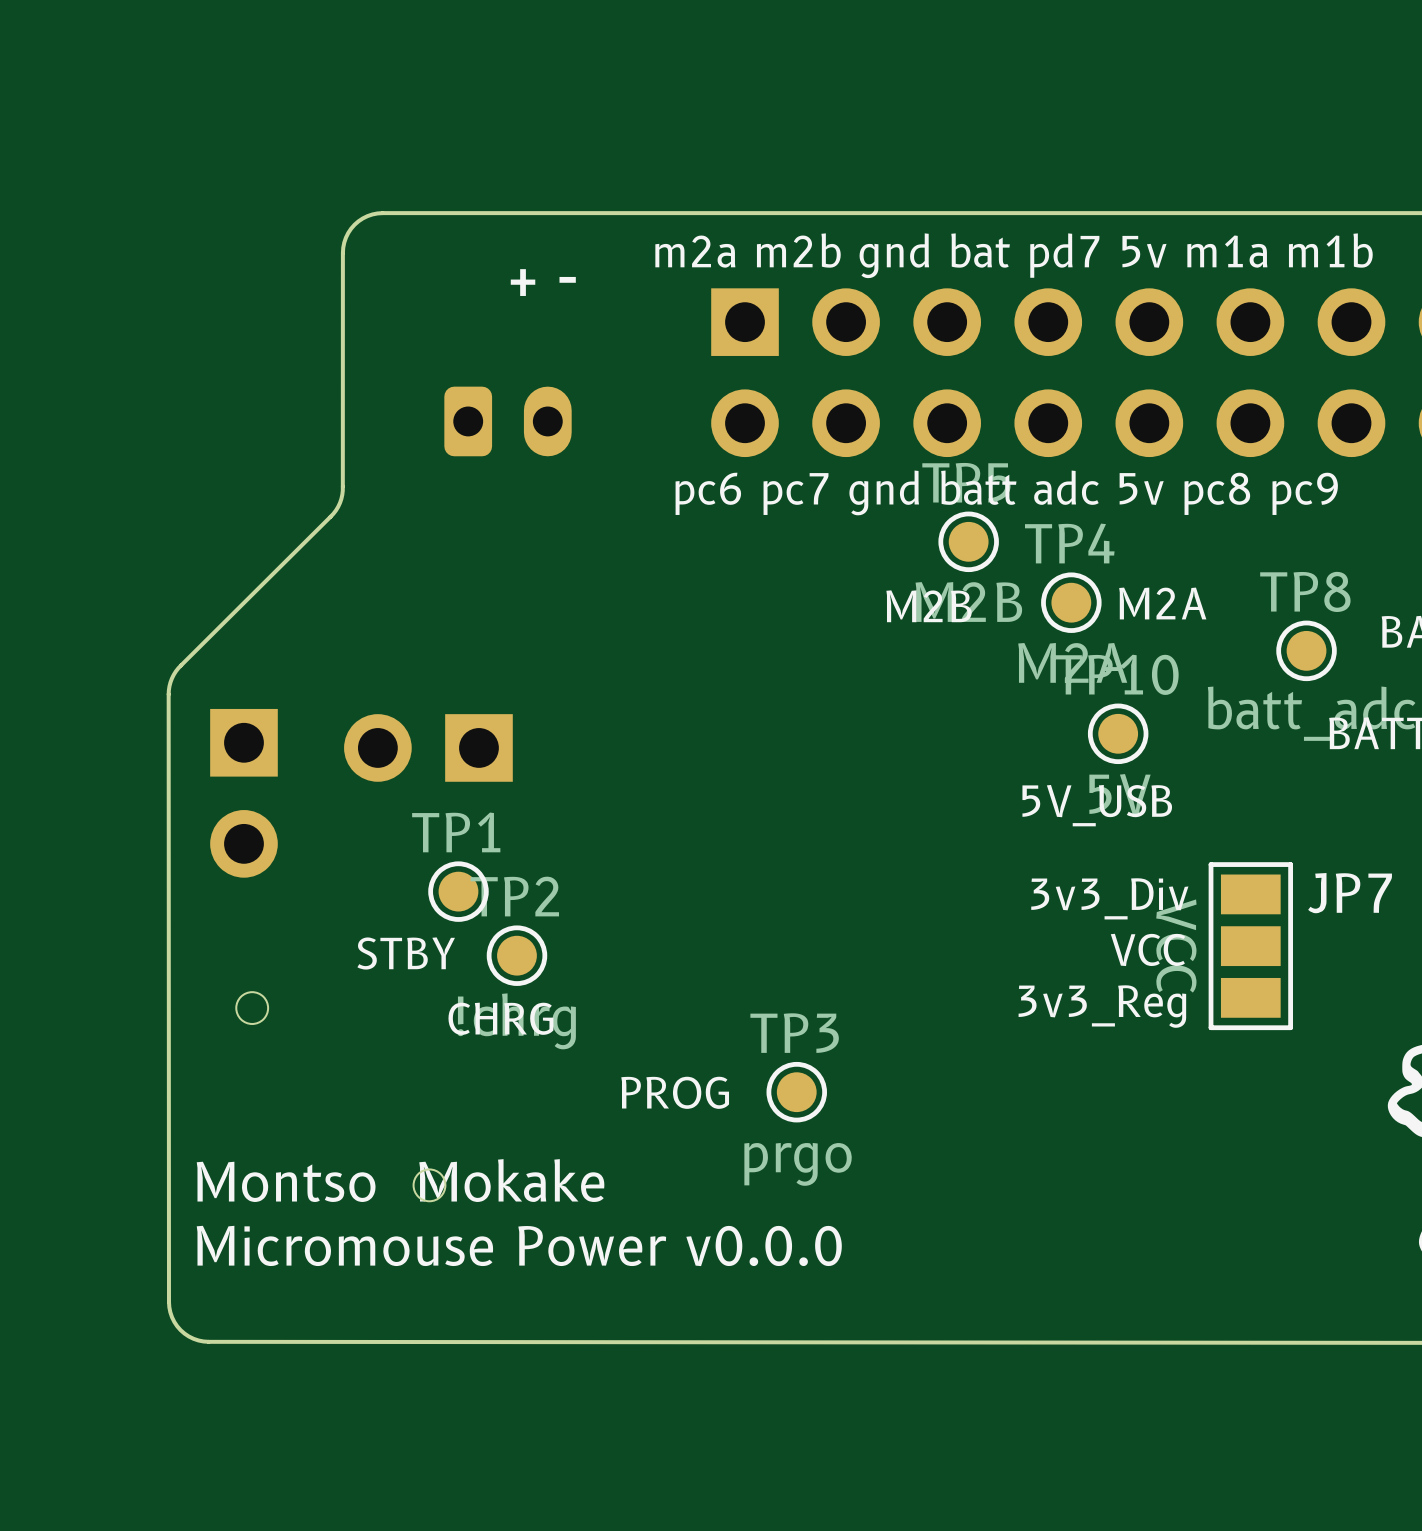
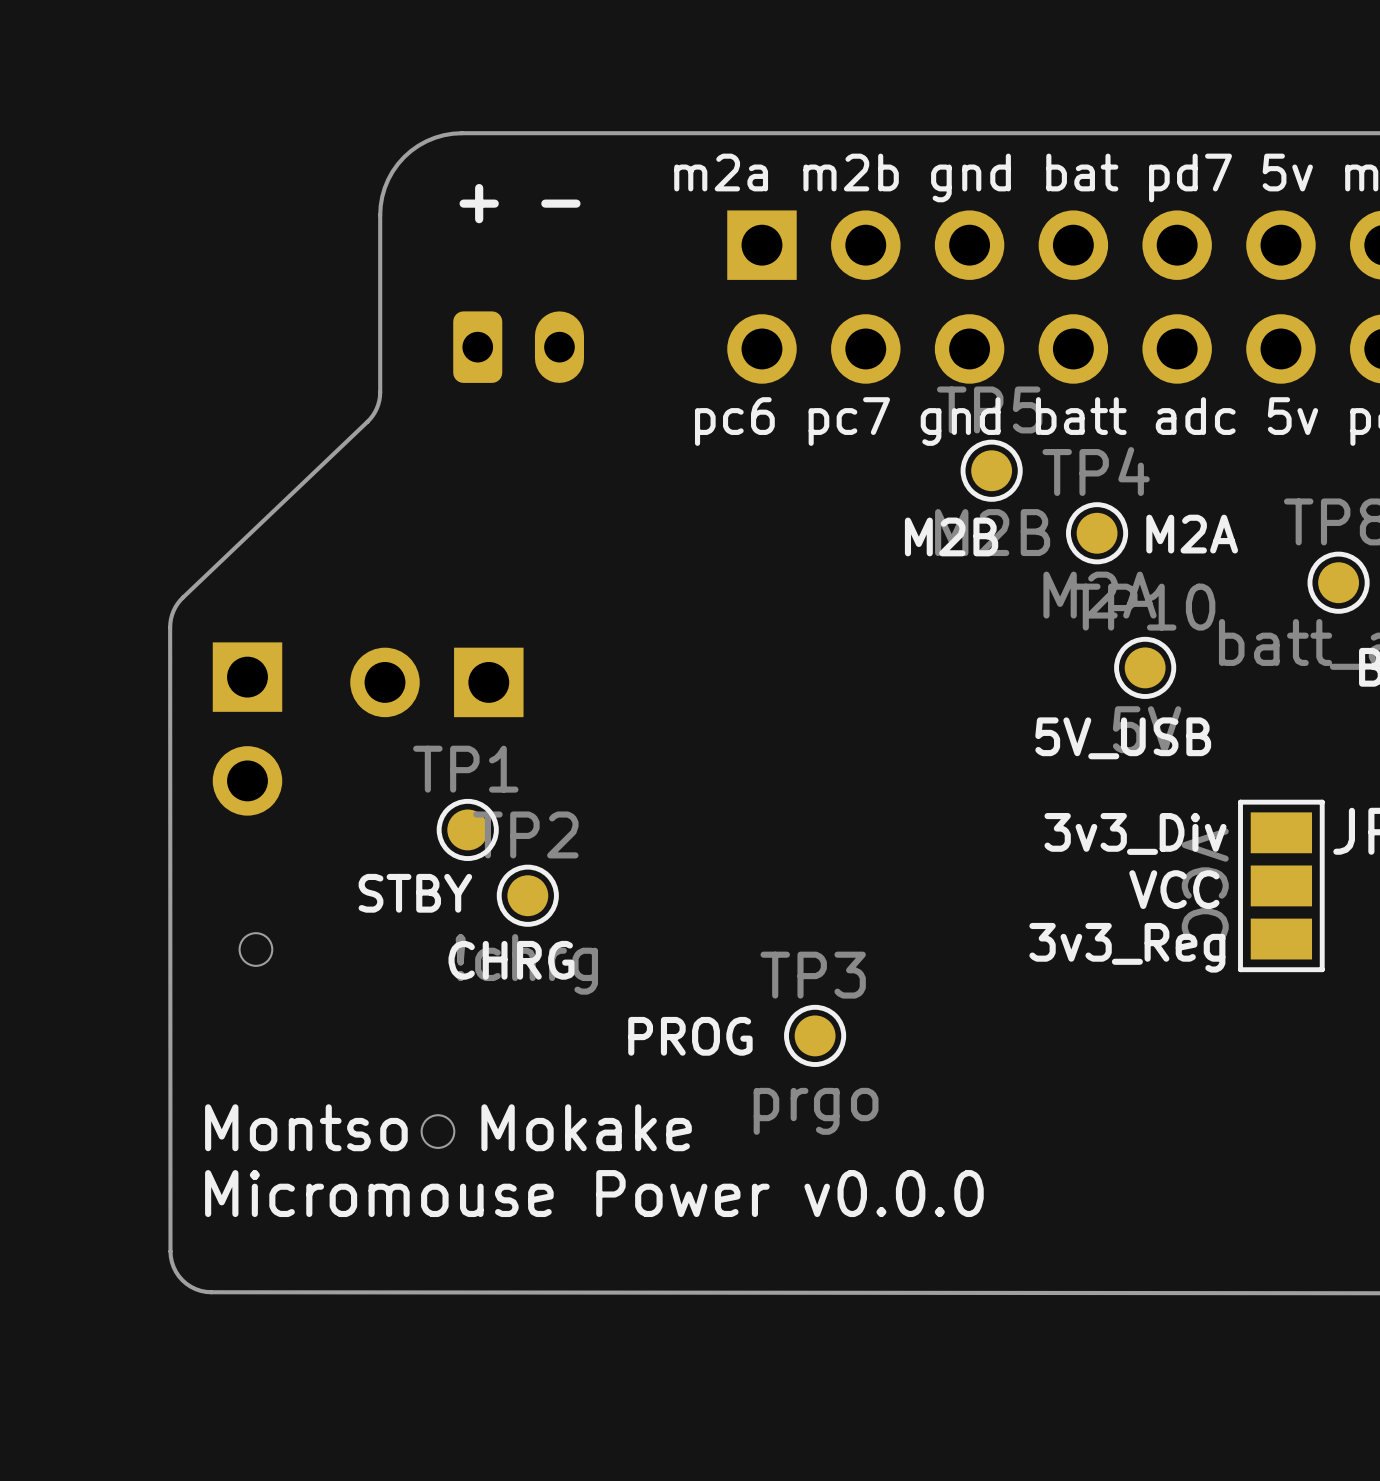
board edge: (452, 213) (377, 213) (362, 218) (348, 232) (342, 252) (342, 490) (339, 502) (330, 516) (181, 665) -> (461, 133) (443, 135) (418, 145) (398, 163) (384, 187) (380, 214) (380, 392) (375, 412) (367, 421) (182, 597)

